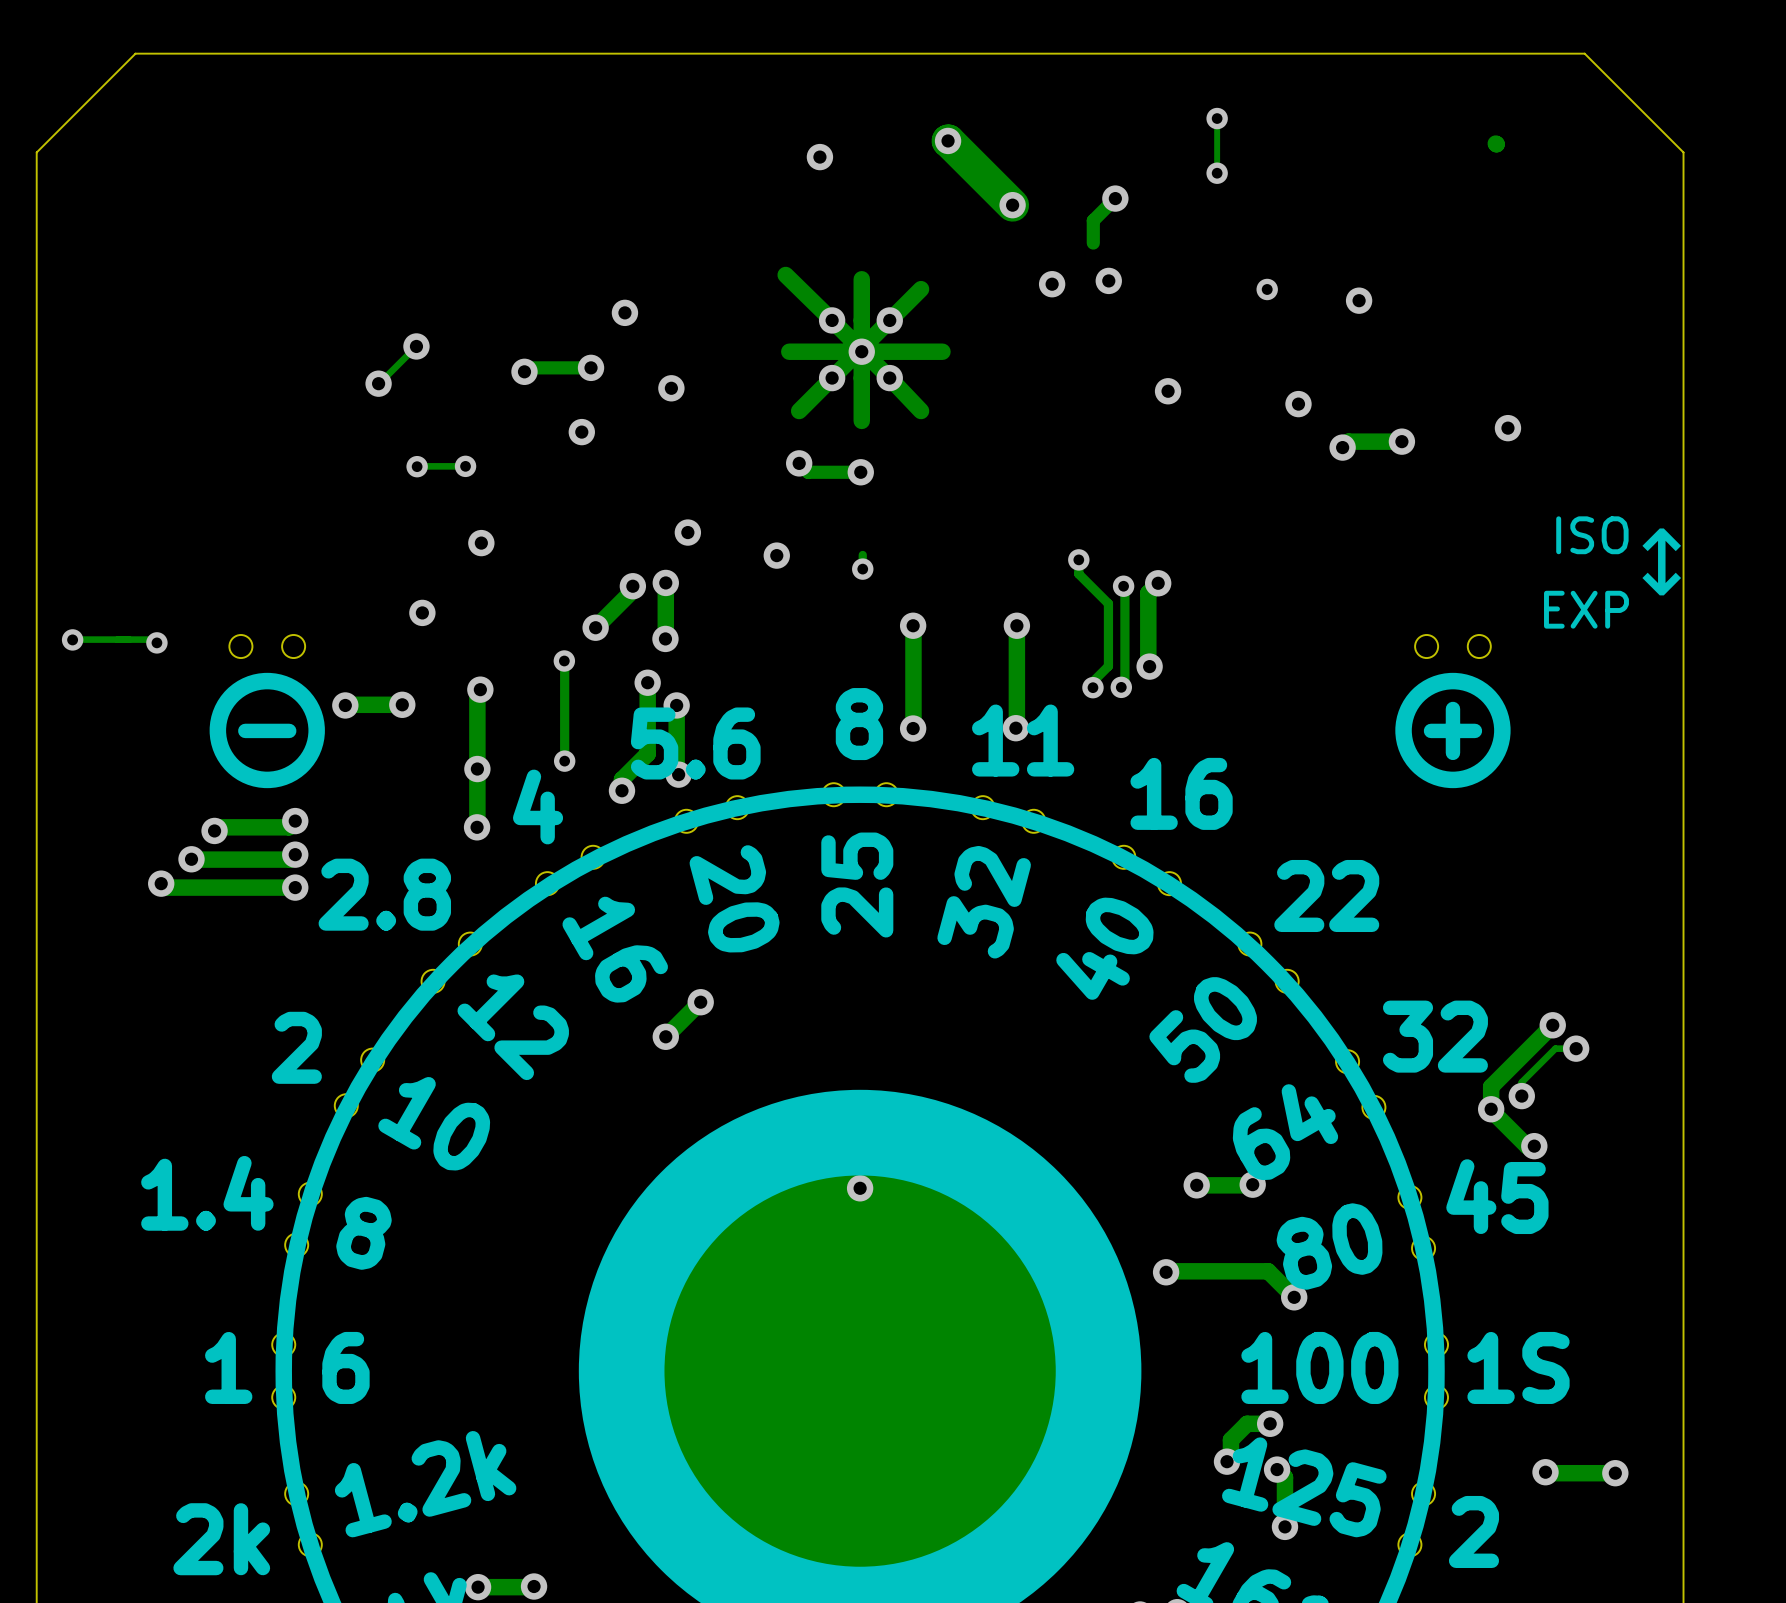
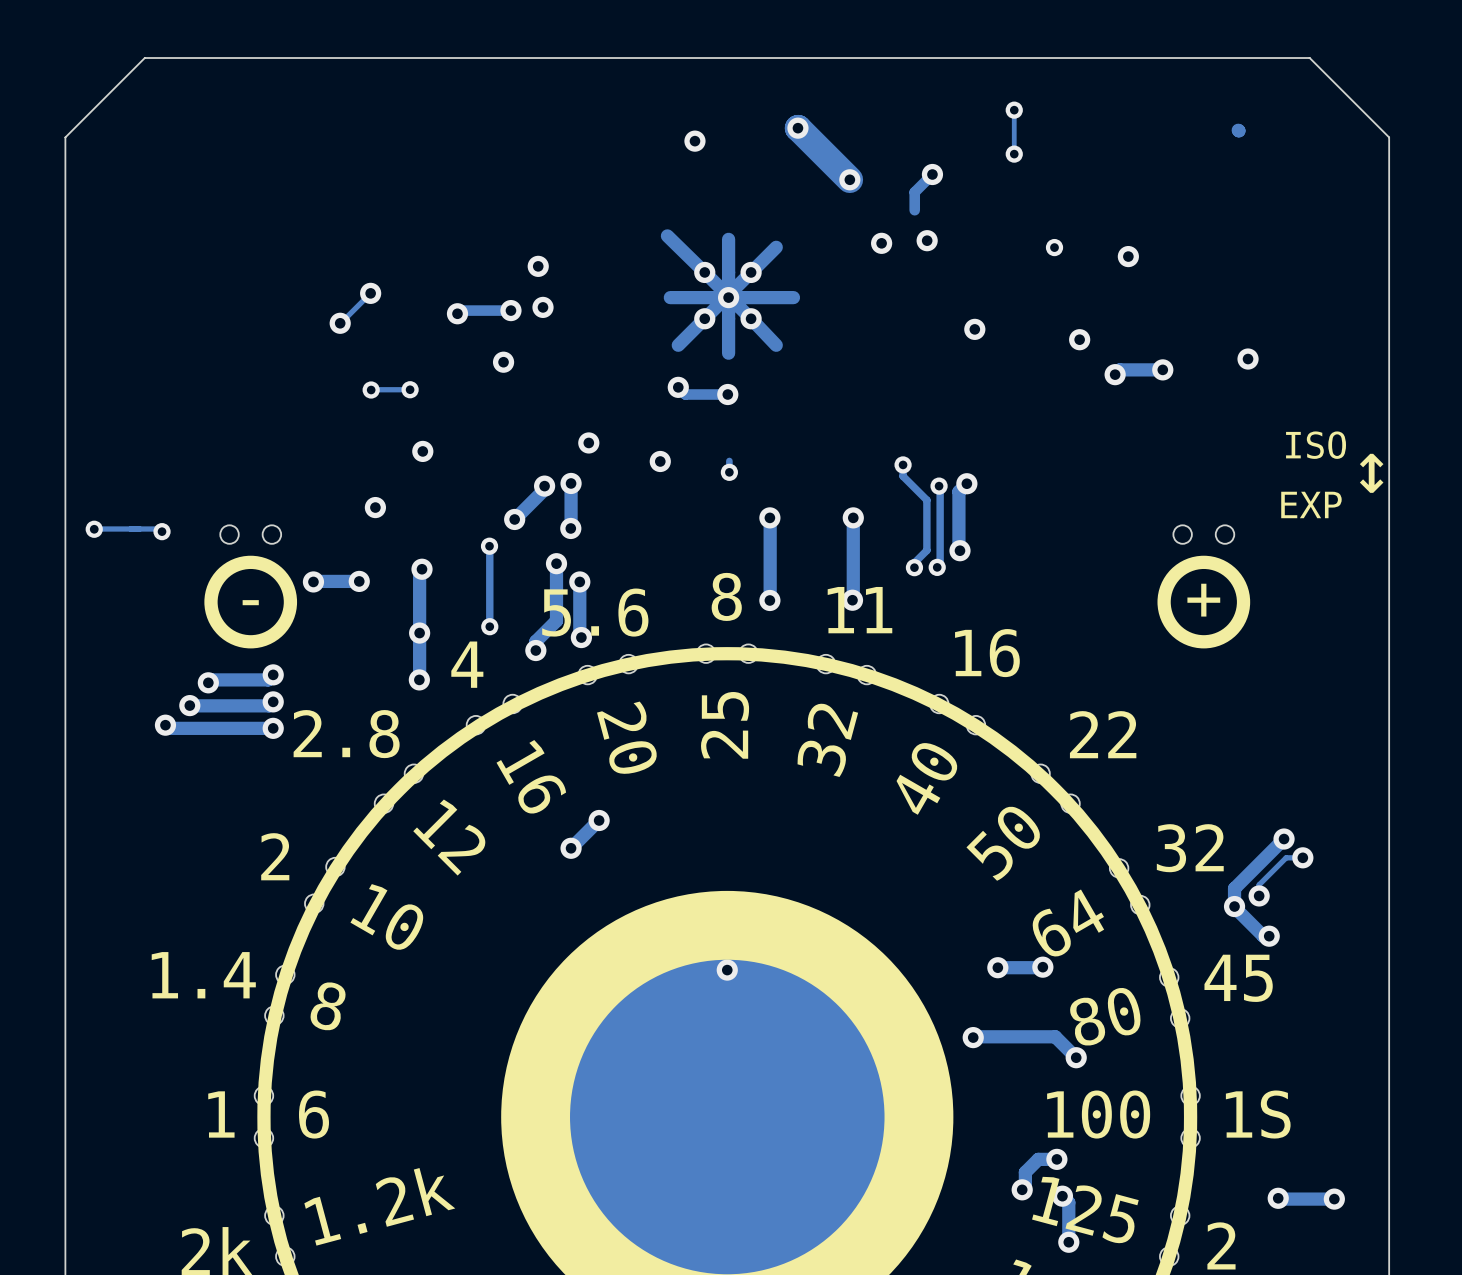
via position: (671, 388) -> (543, 307)

